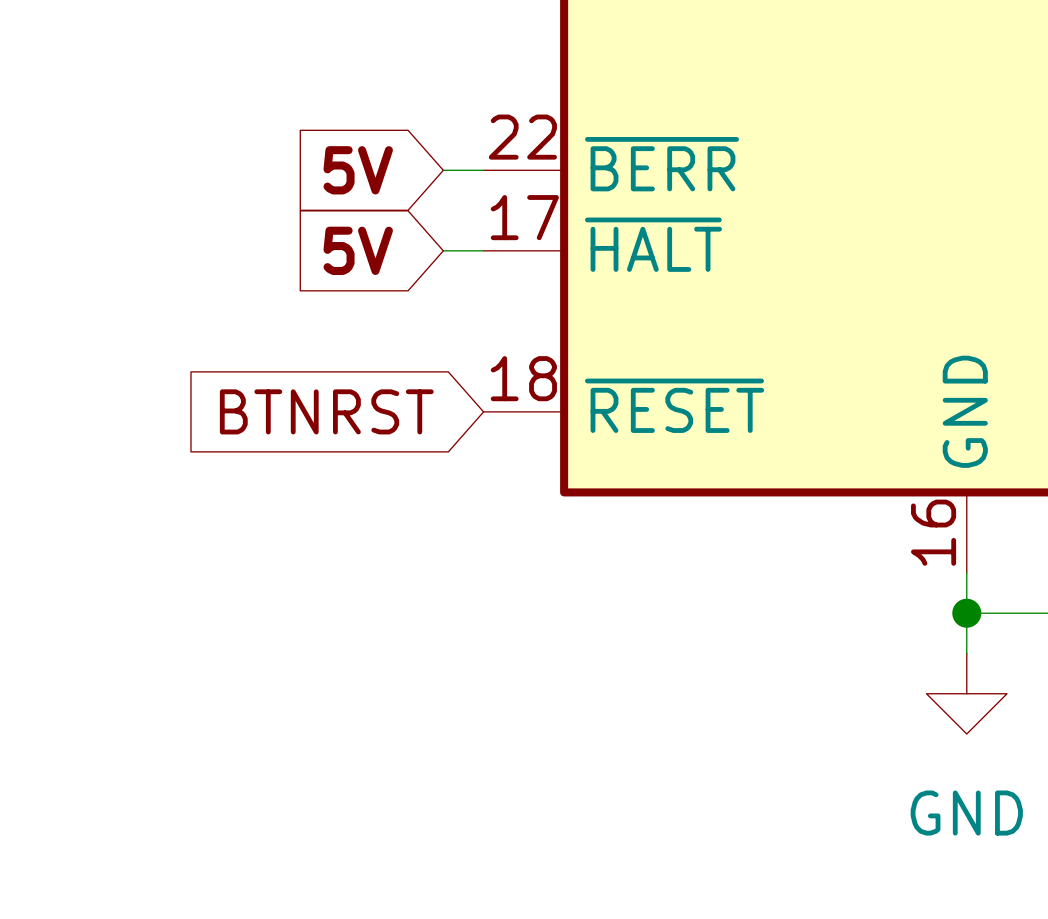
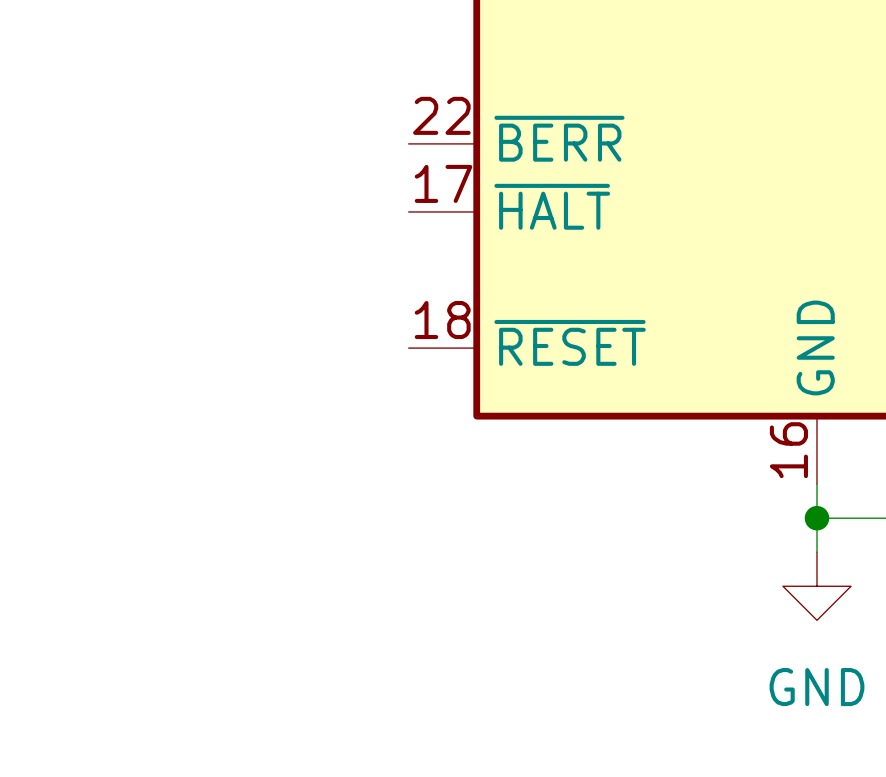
global label: 5V (358, 170) -> none
wire: (443, 170) (483, 170) -> none
global label: 5V (358, 250) -> none
wire: (443, 250) (483, 250) -> none
global label: BTNRST (326, 411) -> none

